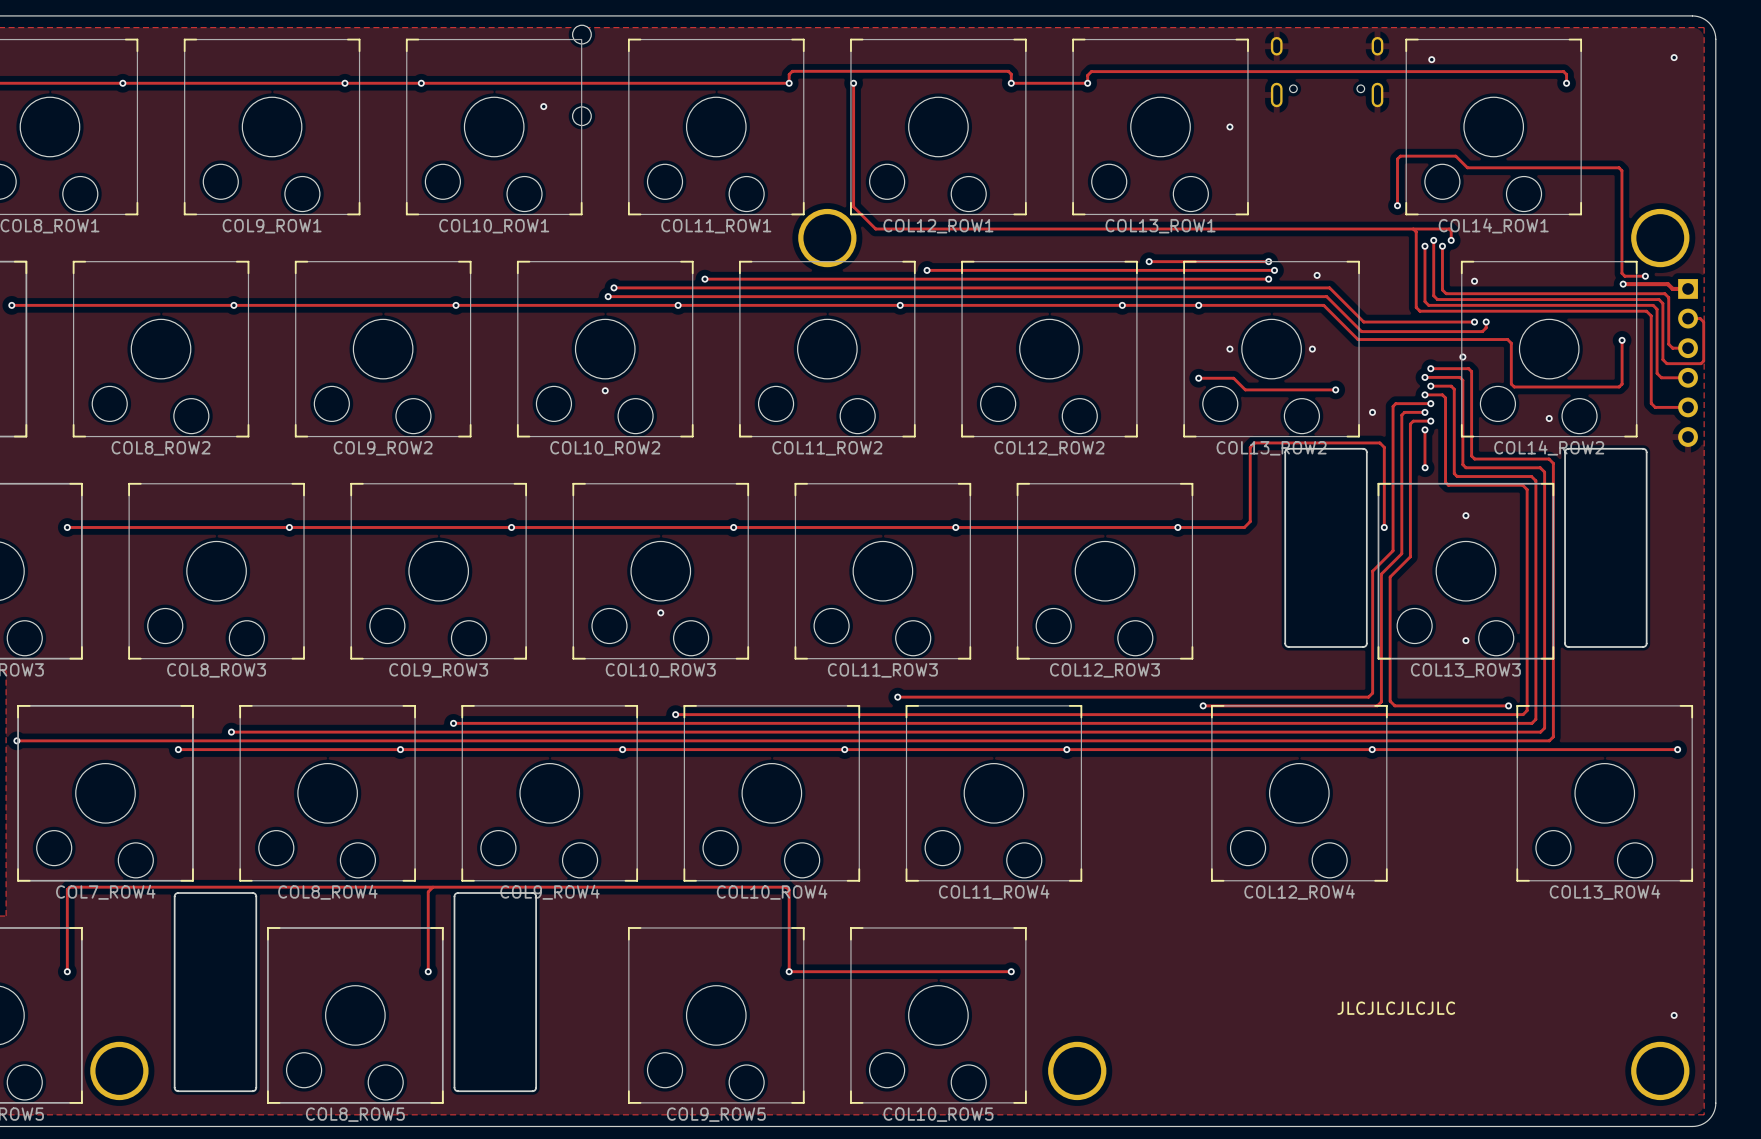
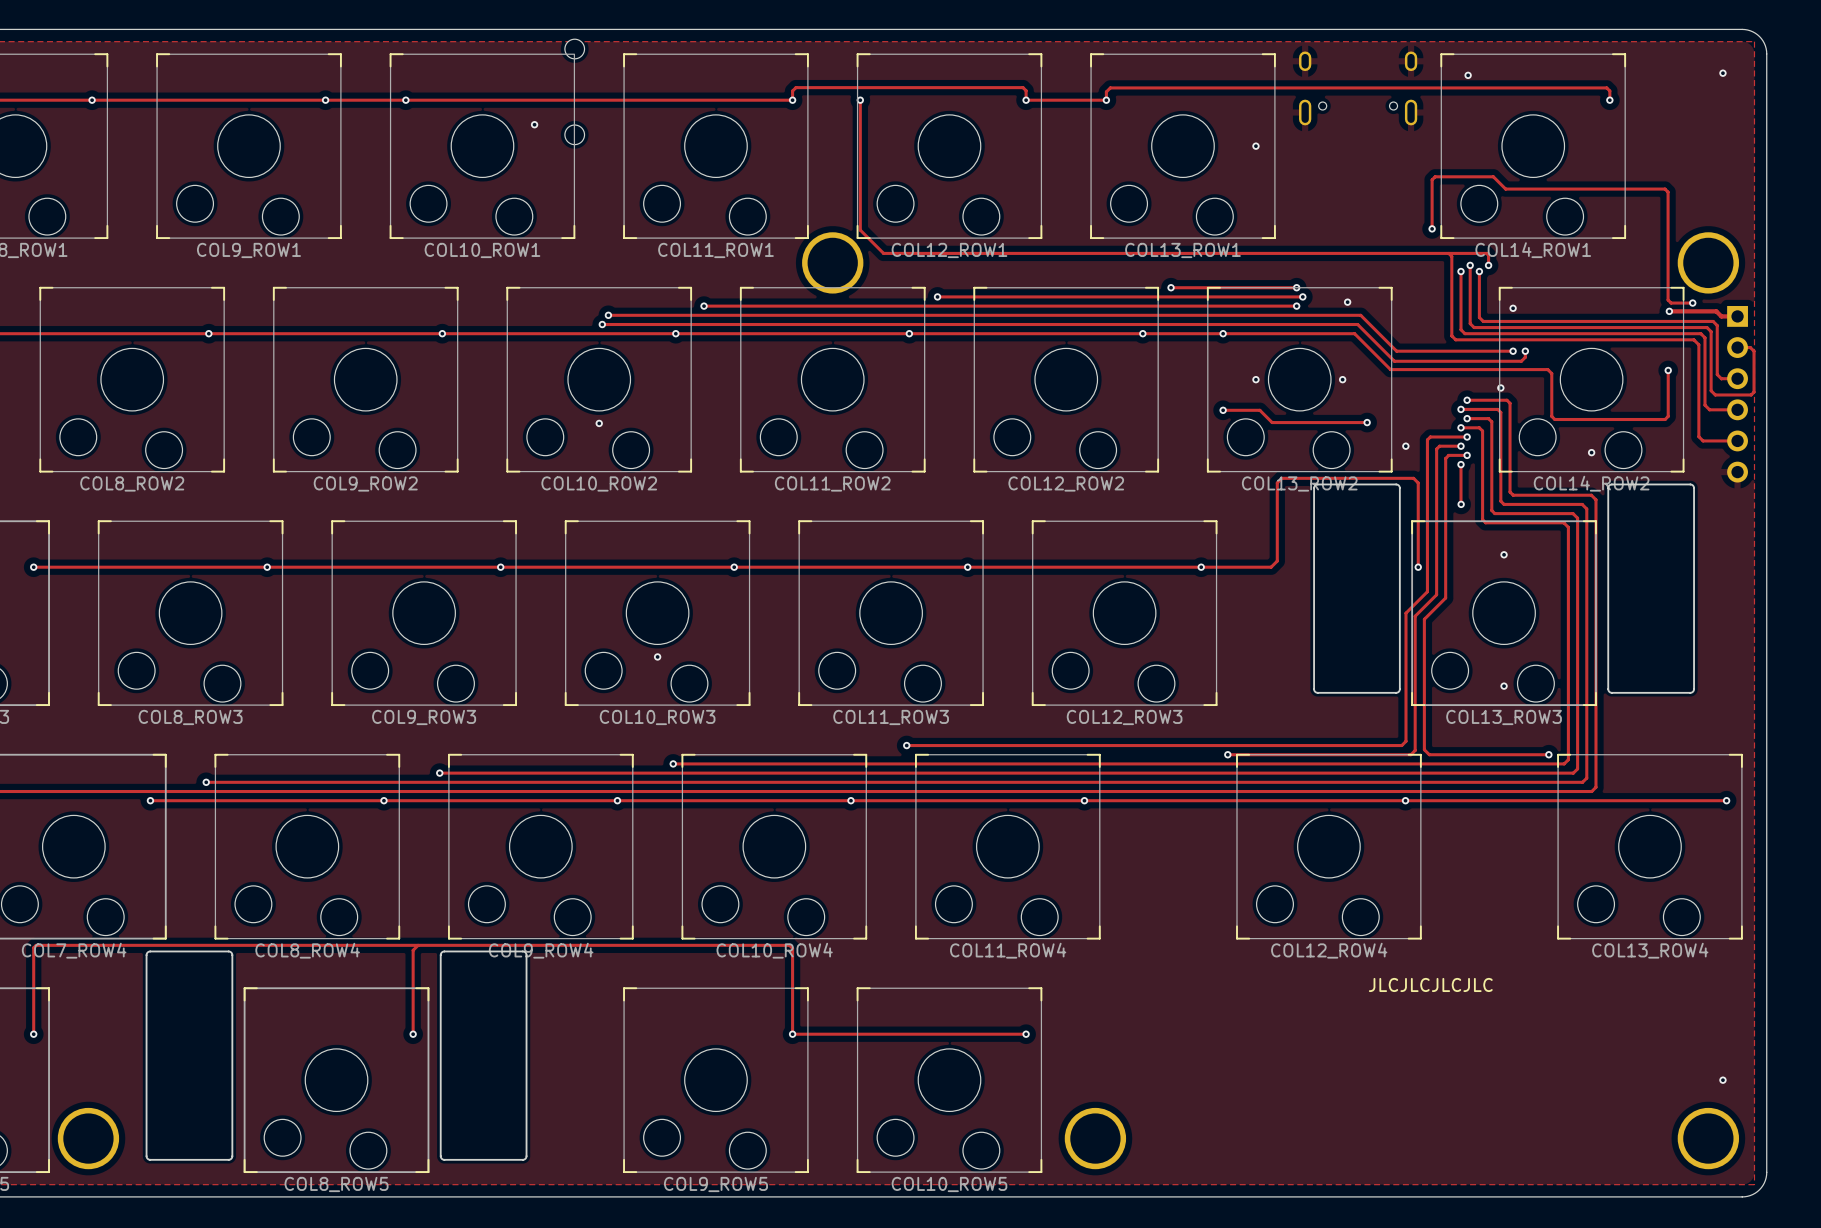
text position: JLCJLCJLCJLC (1396, 1008) -> JLCJLCJLCJLC (1430, 984)

